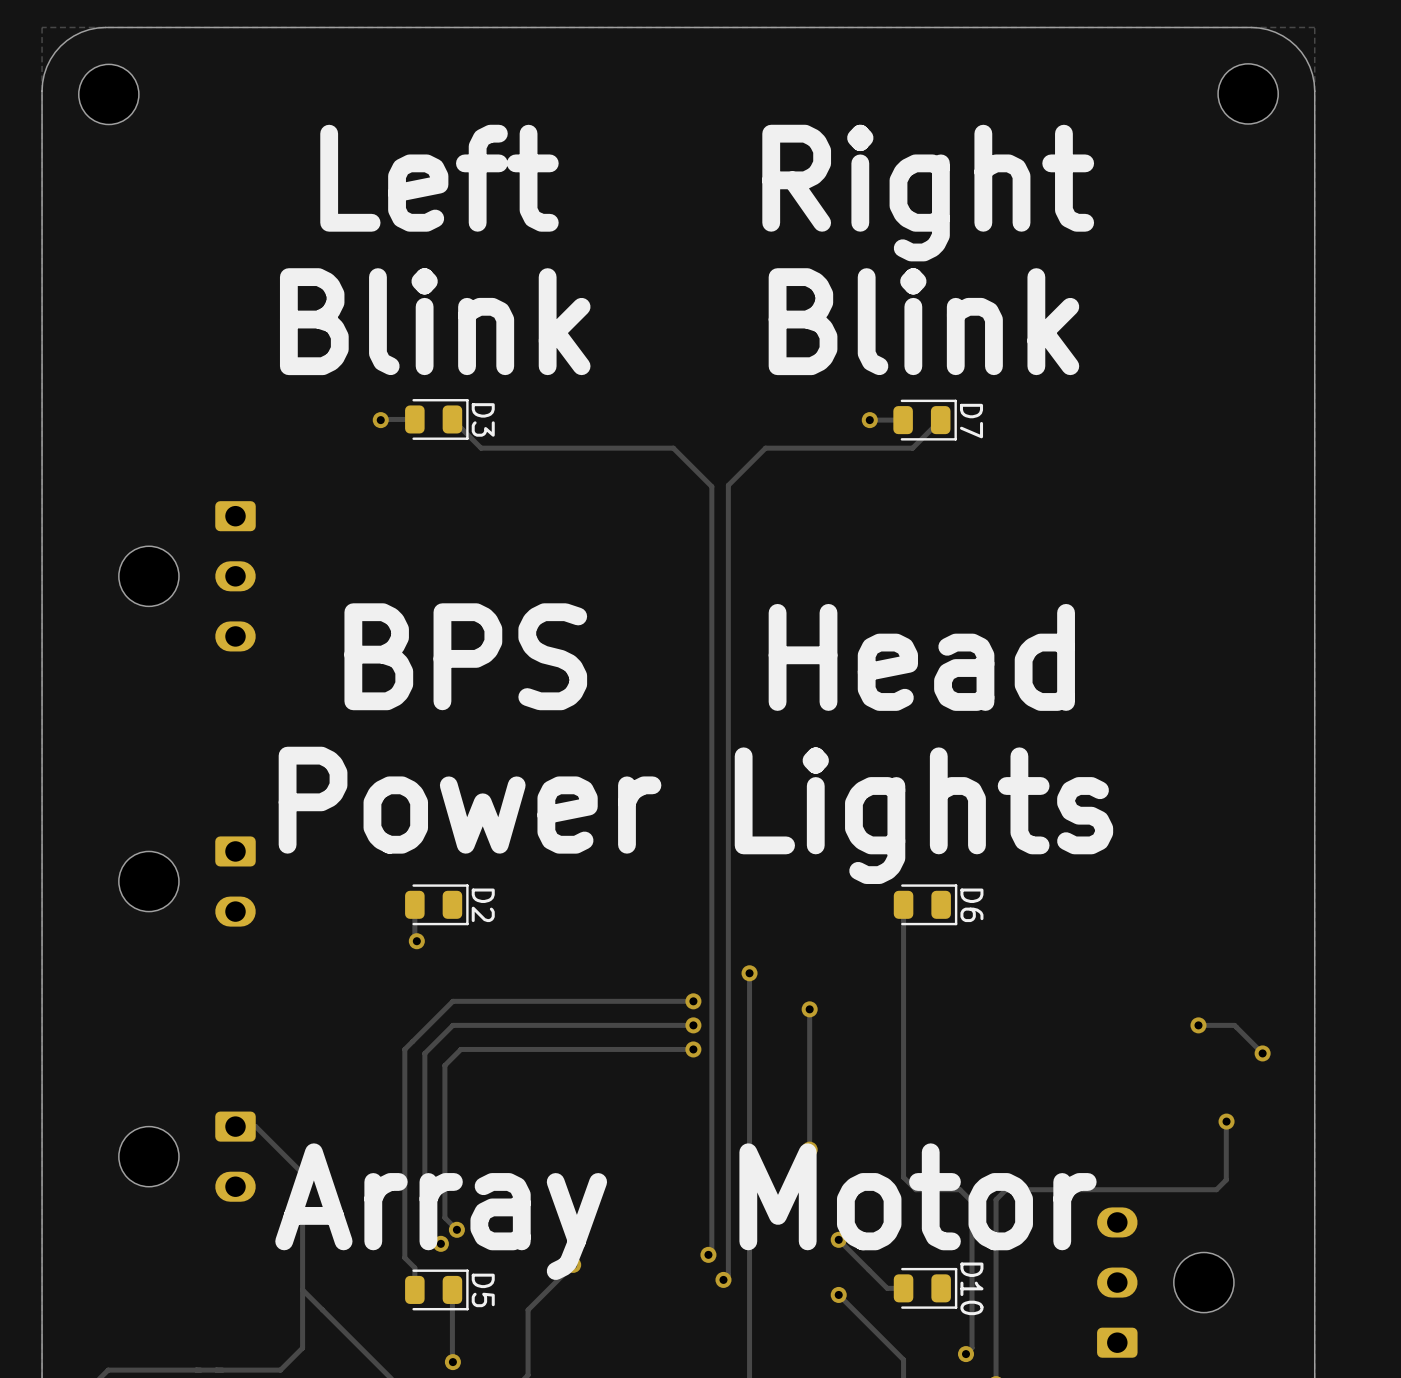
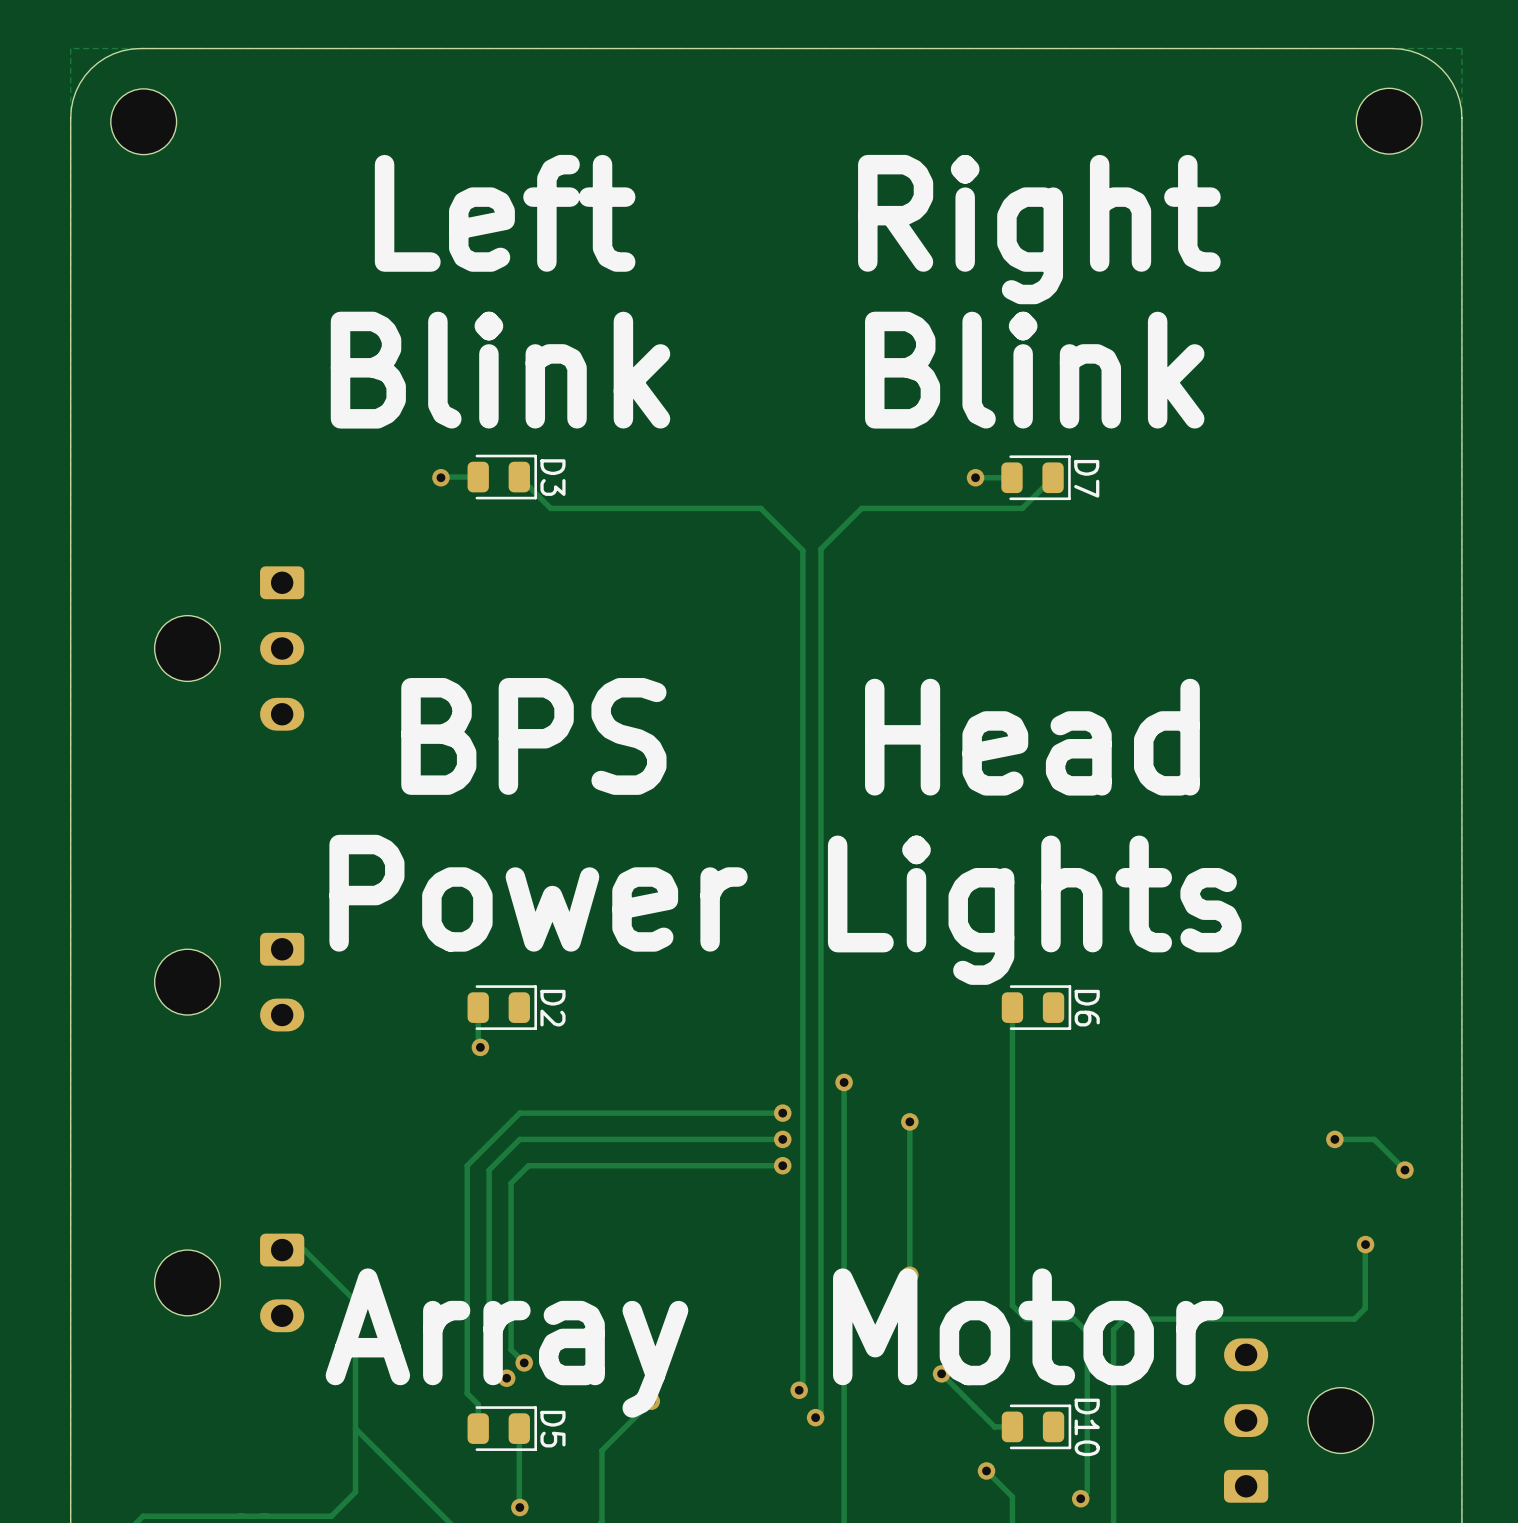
track: (838, 1294) (903, 1359) -> (985, 1469) (1012, 1496) (1012, 1504)
via position: (838, 1294) -> (986, 1470)

